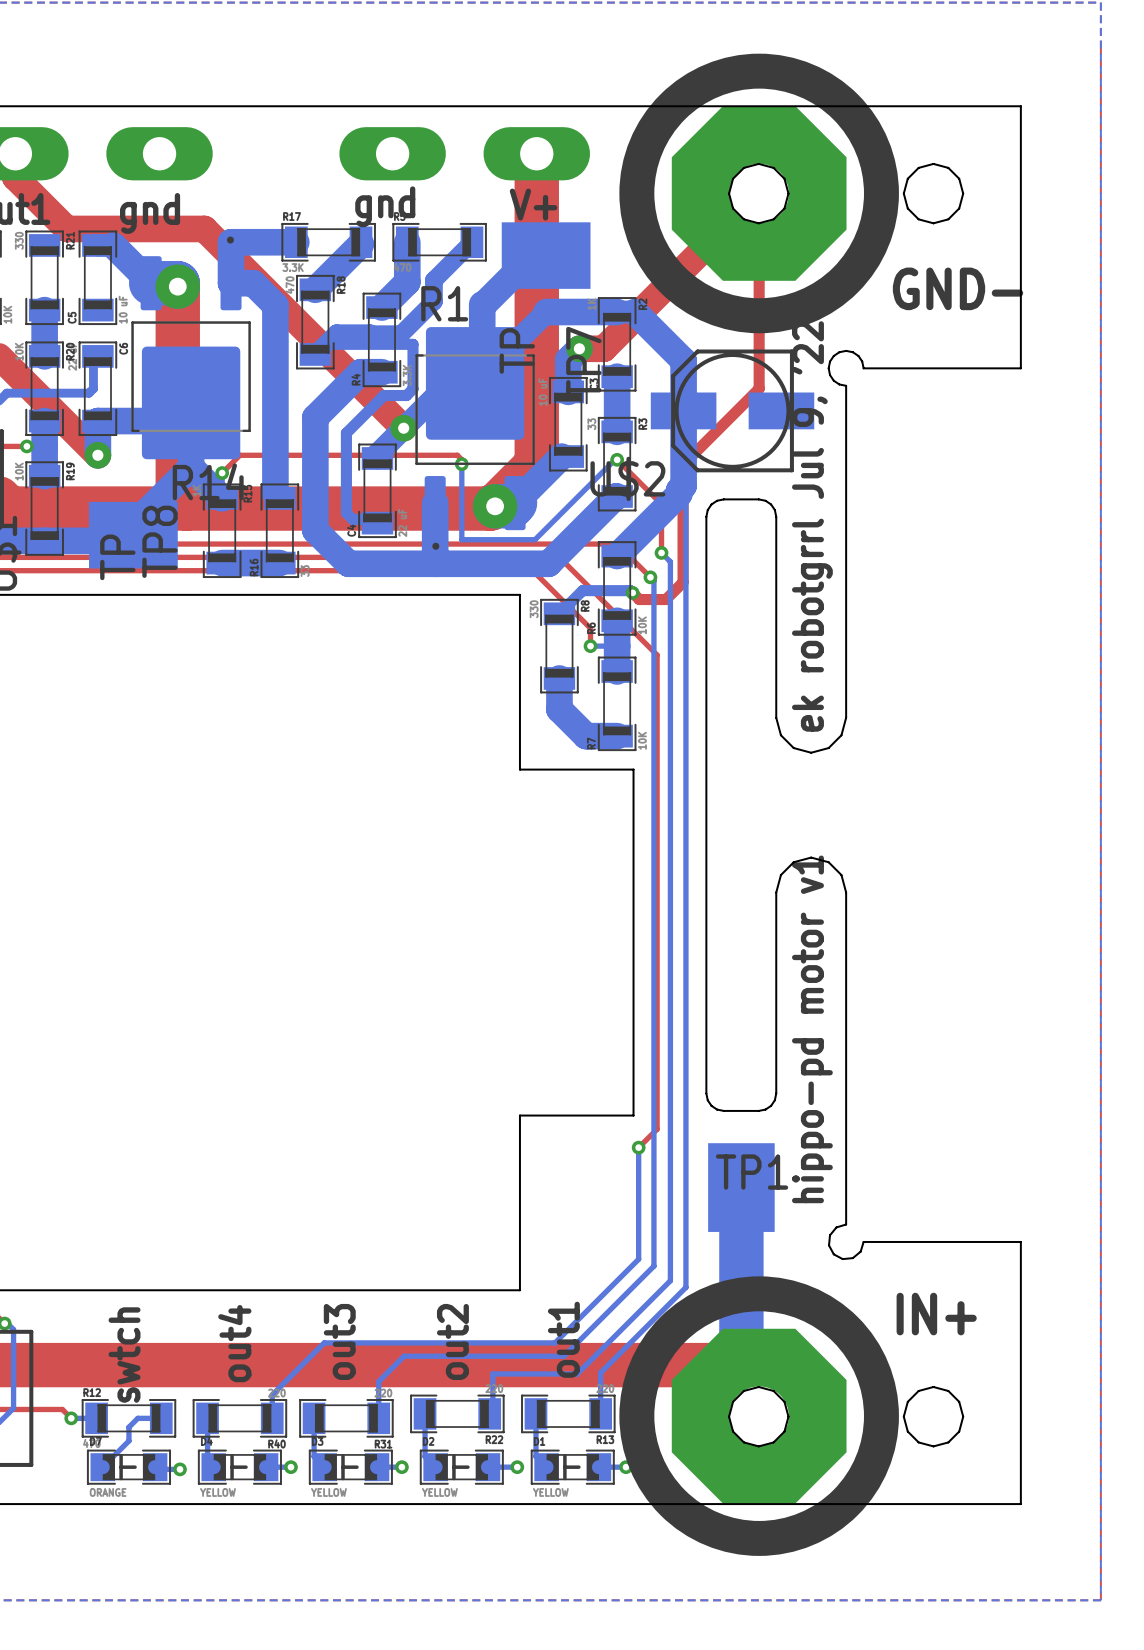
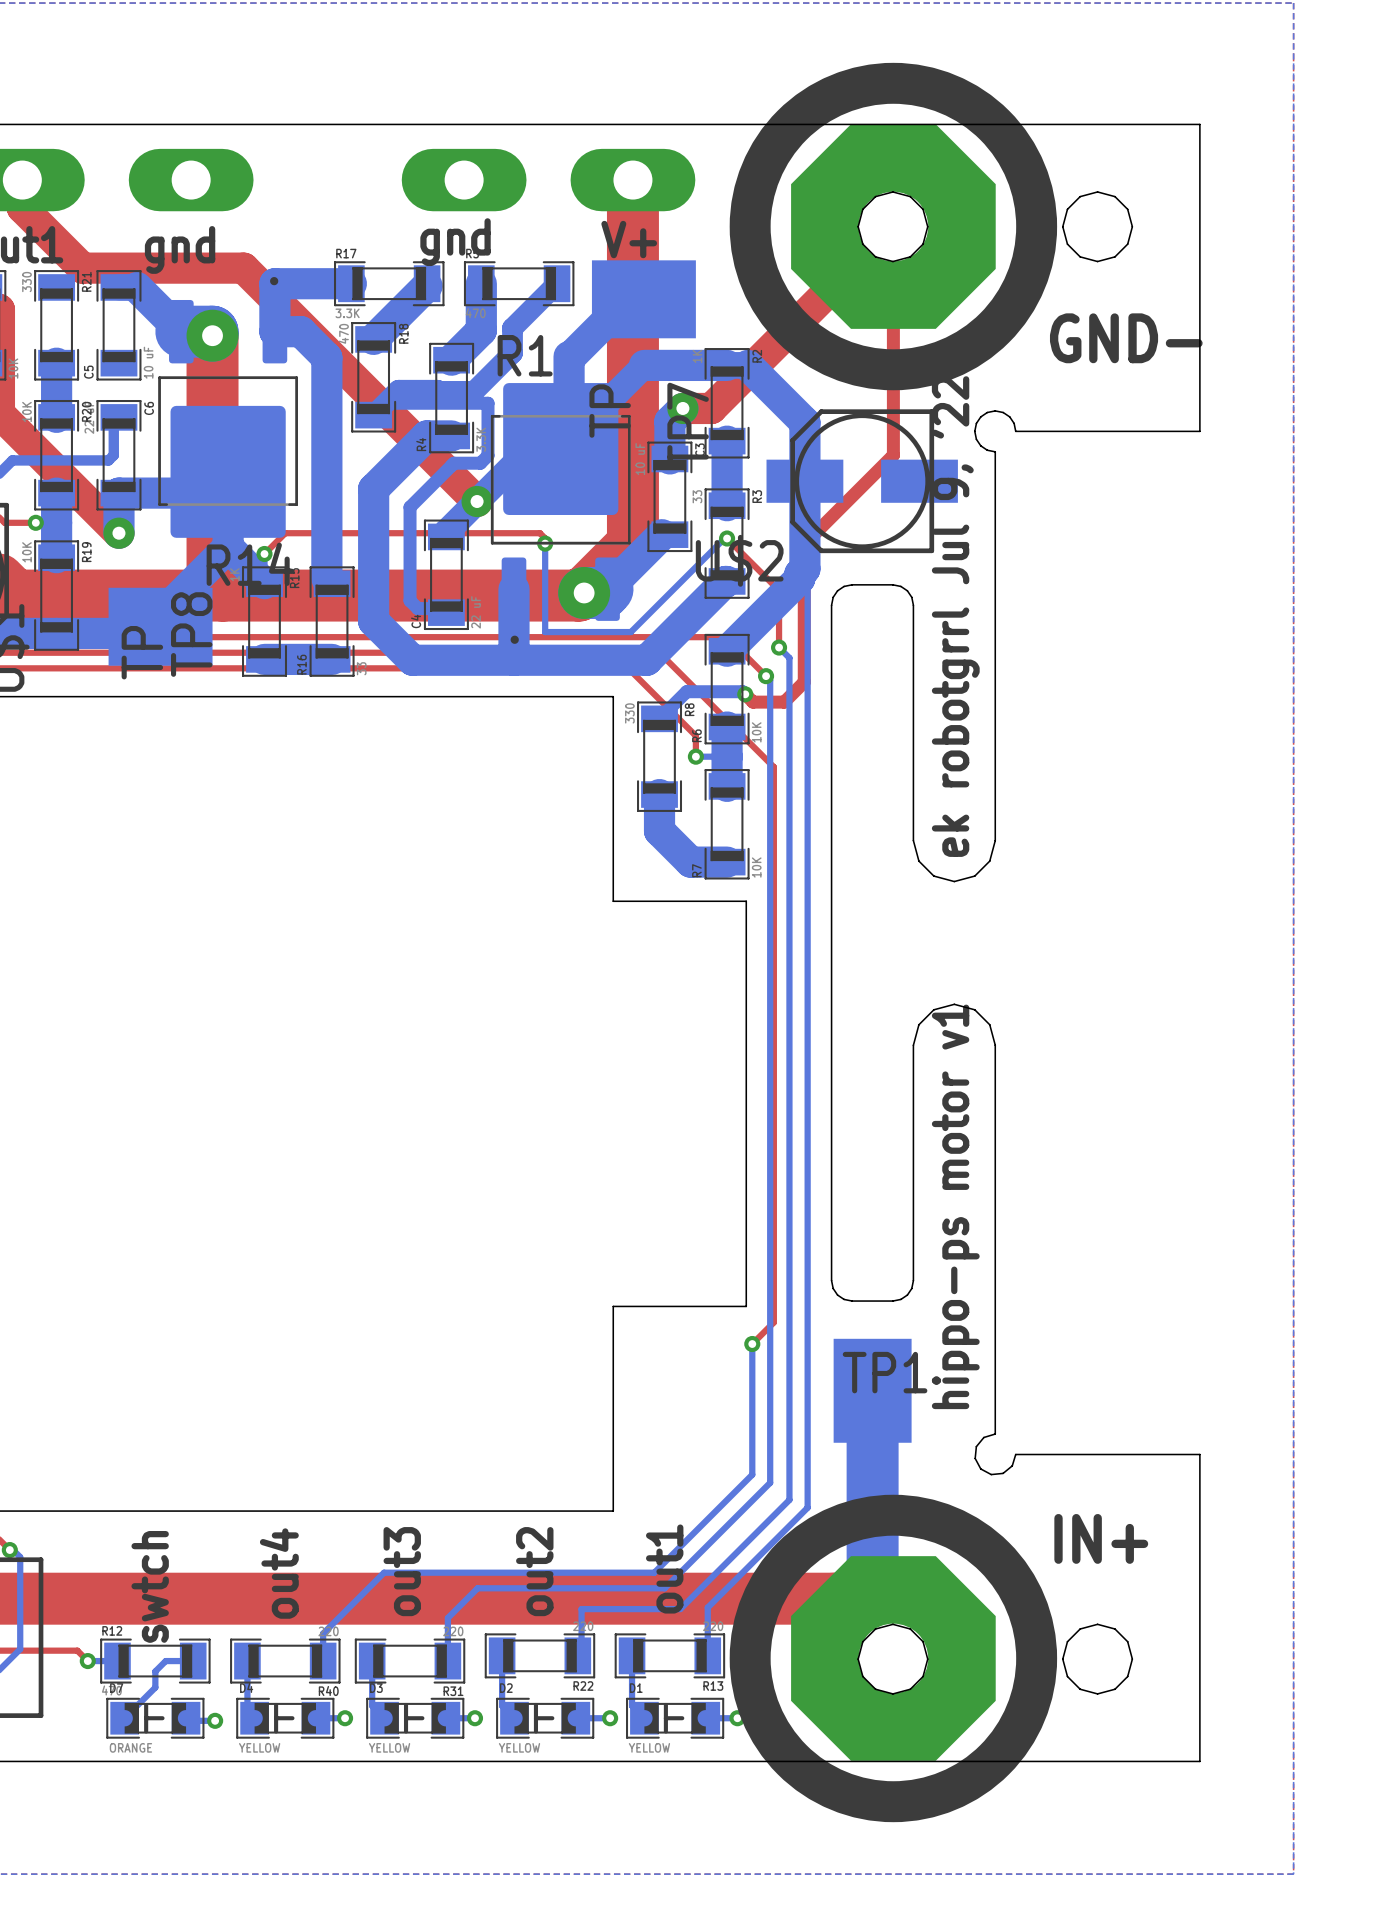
text: hippo-pd motor v1 (812, 1029) -> hippo-ps motor v1 (955, 1206)

